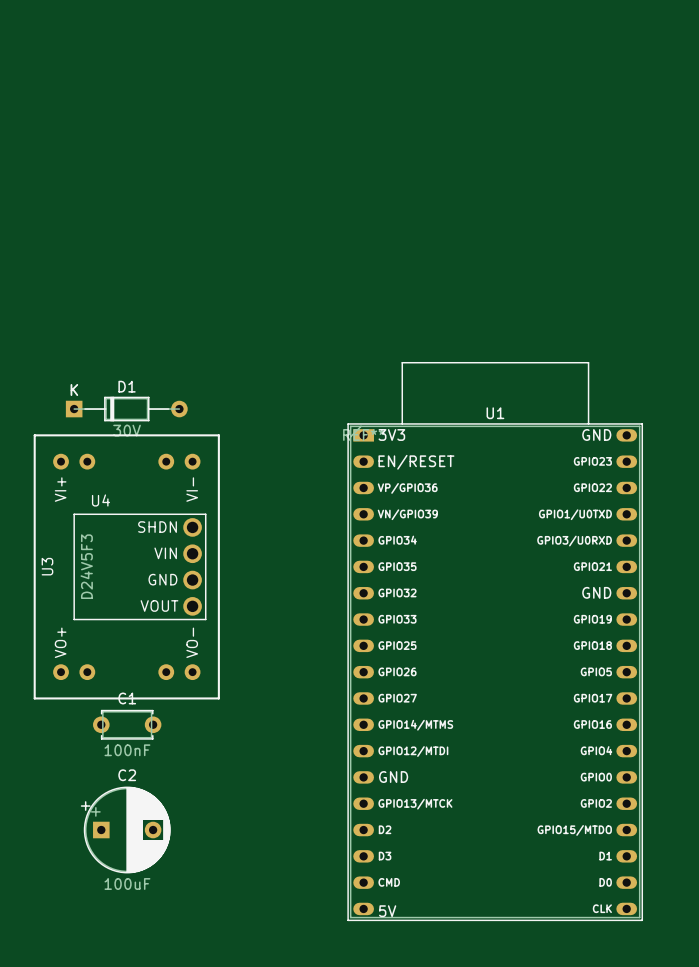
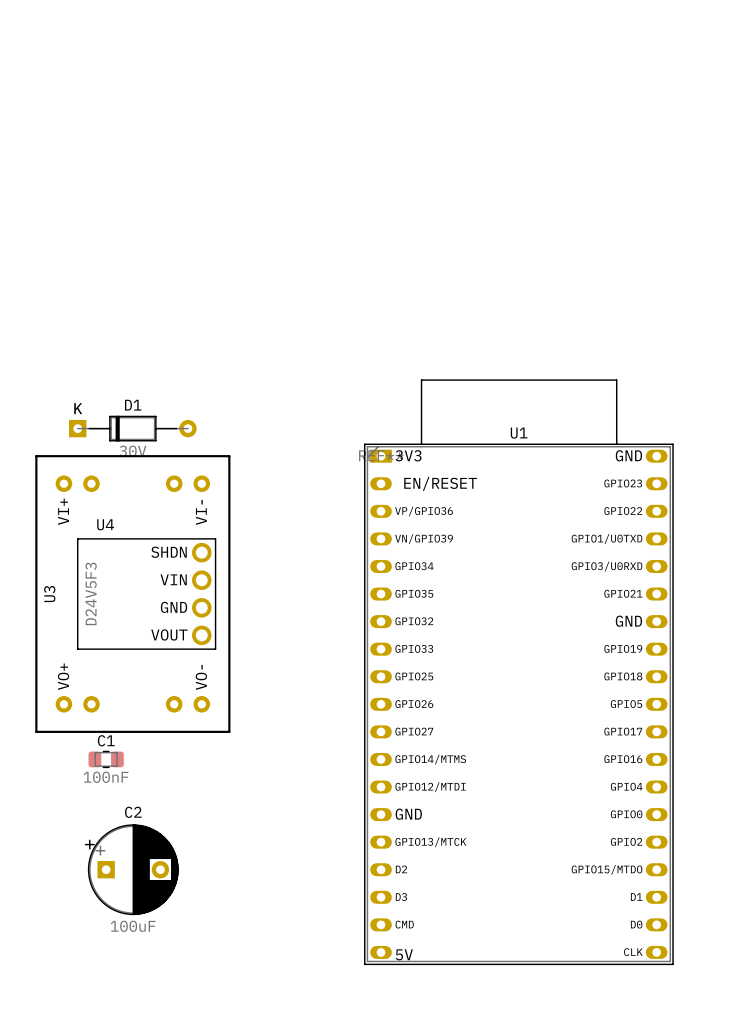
C1 footprint: [93, 709, 162, 740] -> [88, 750, 124, 769]

